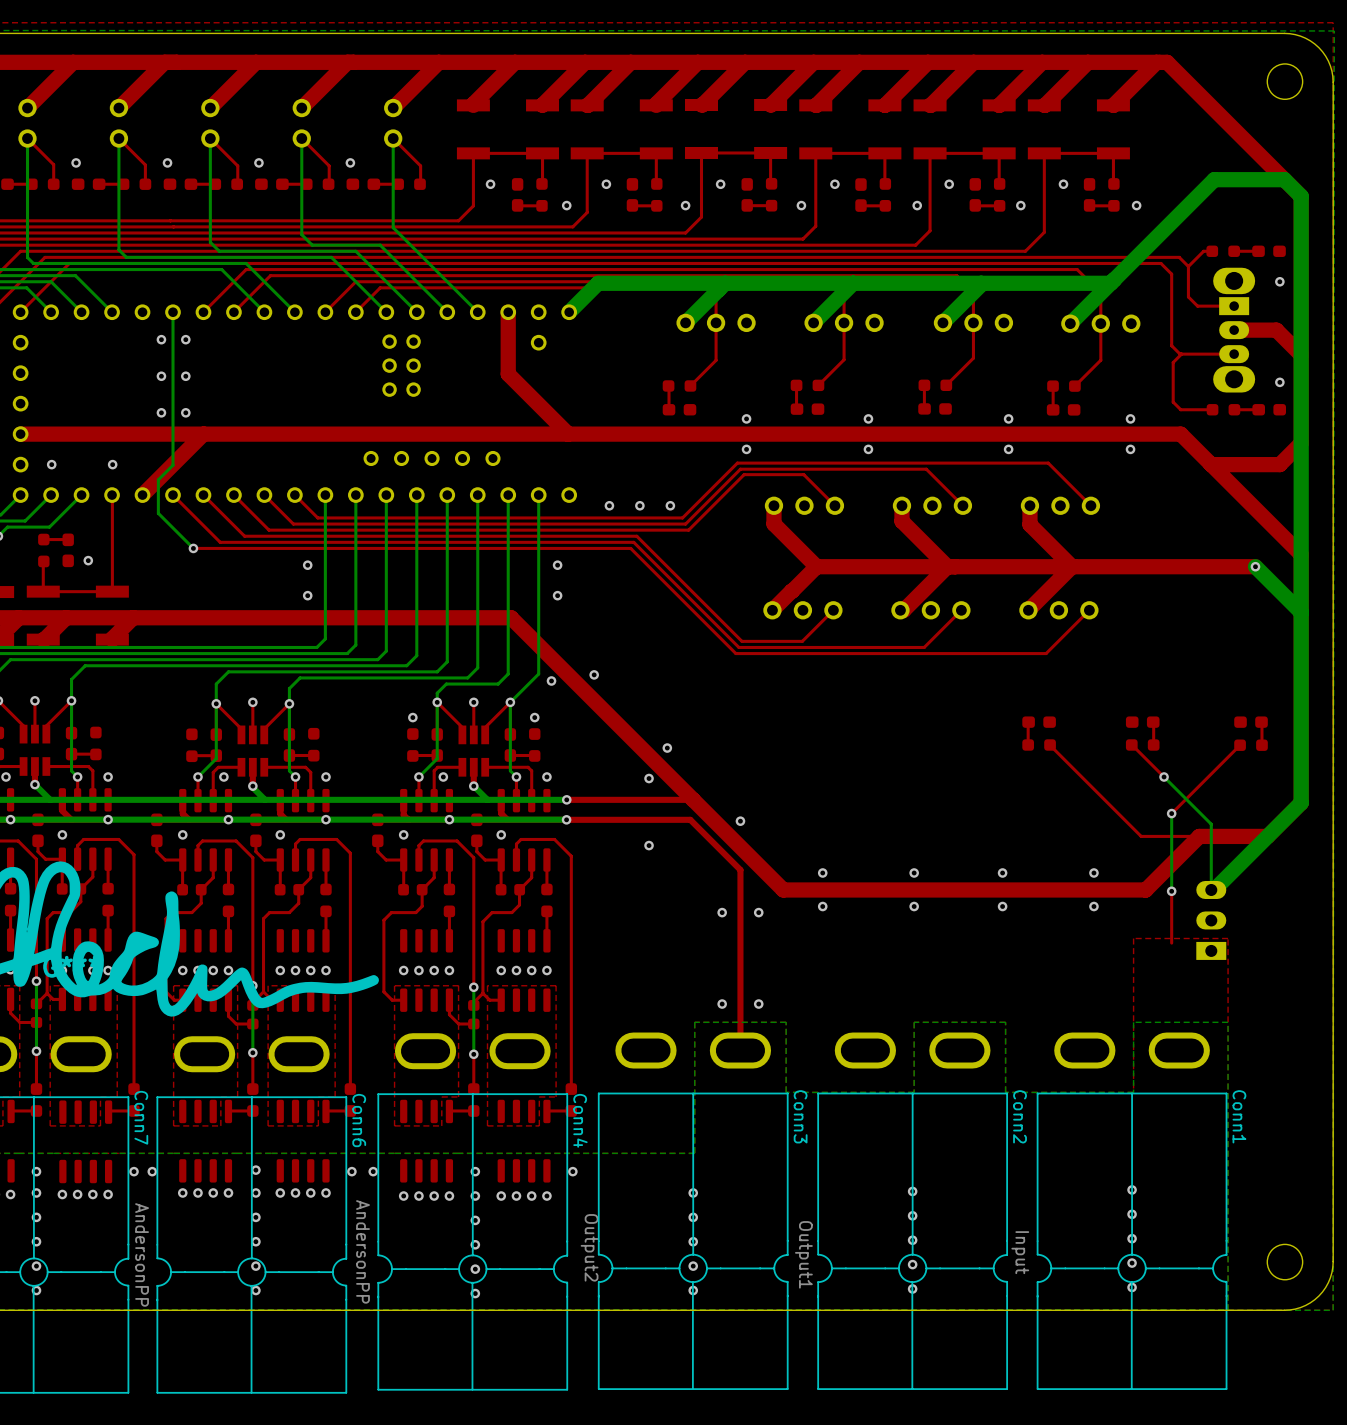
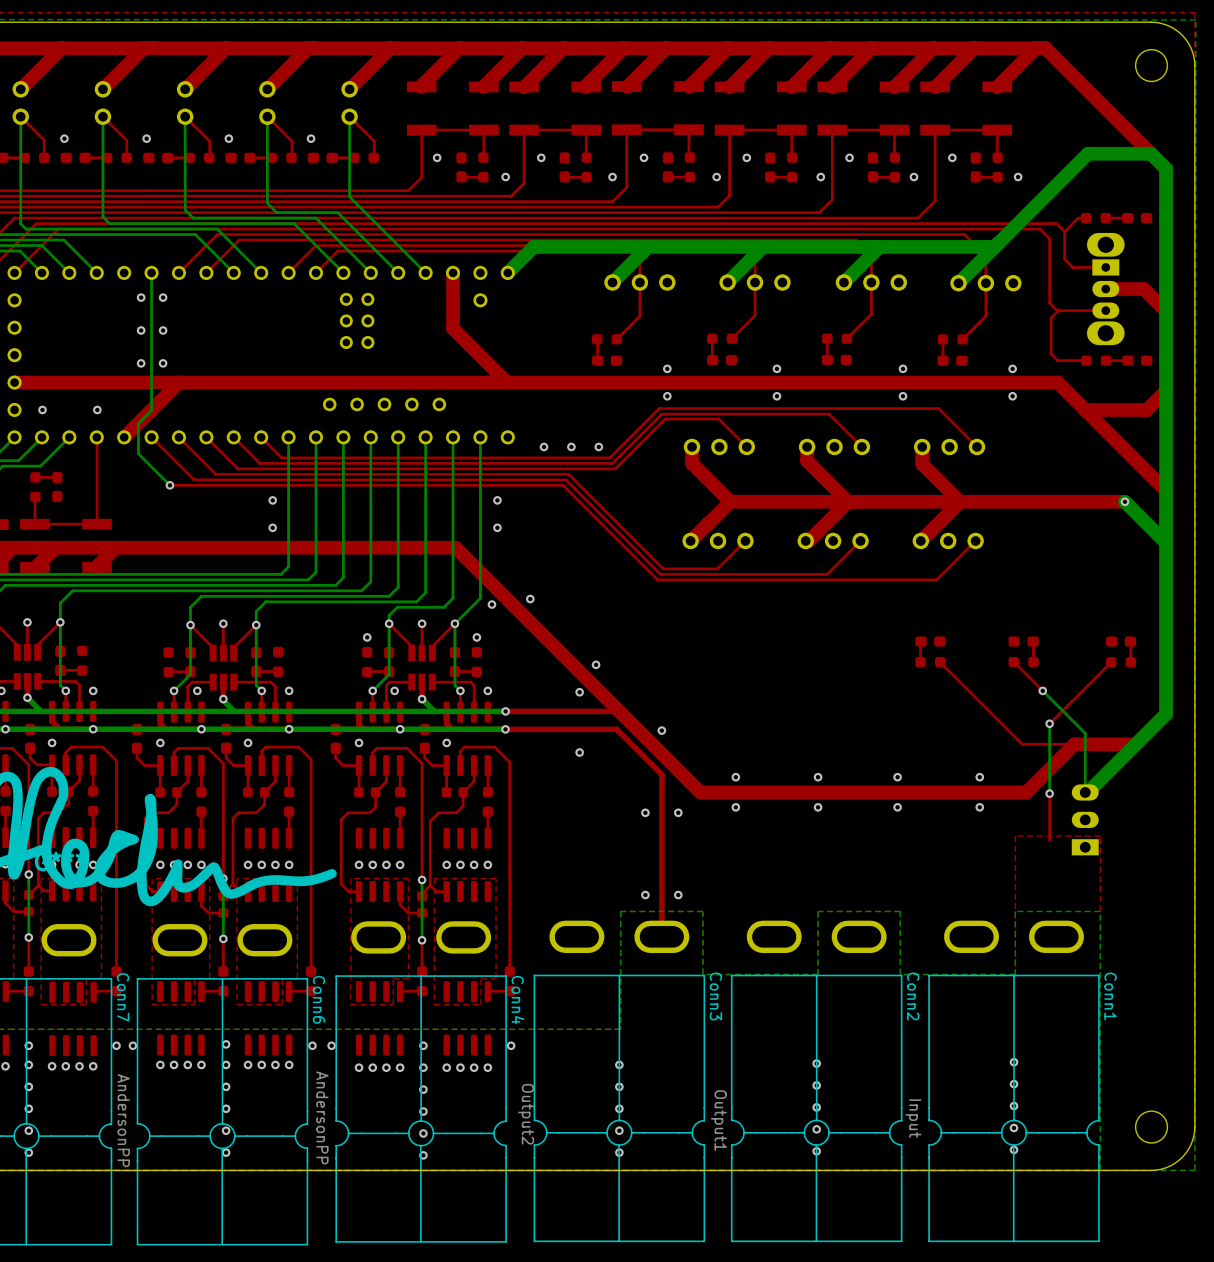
via: (1279, 281) -> none
via: (1279, 382) -> none
via: (88, 560) -> none

